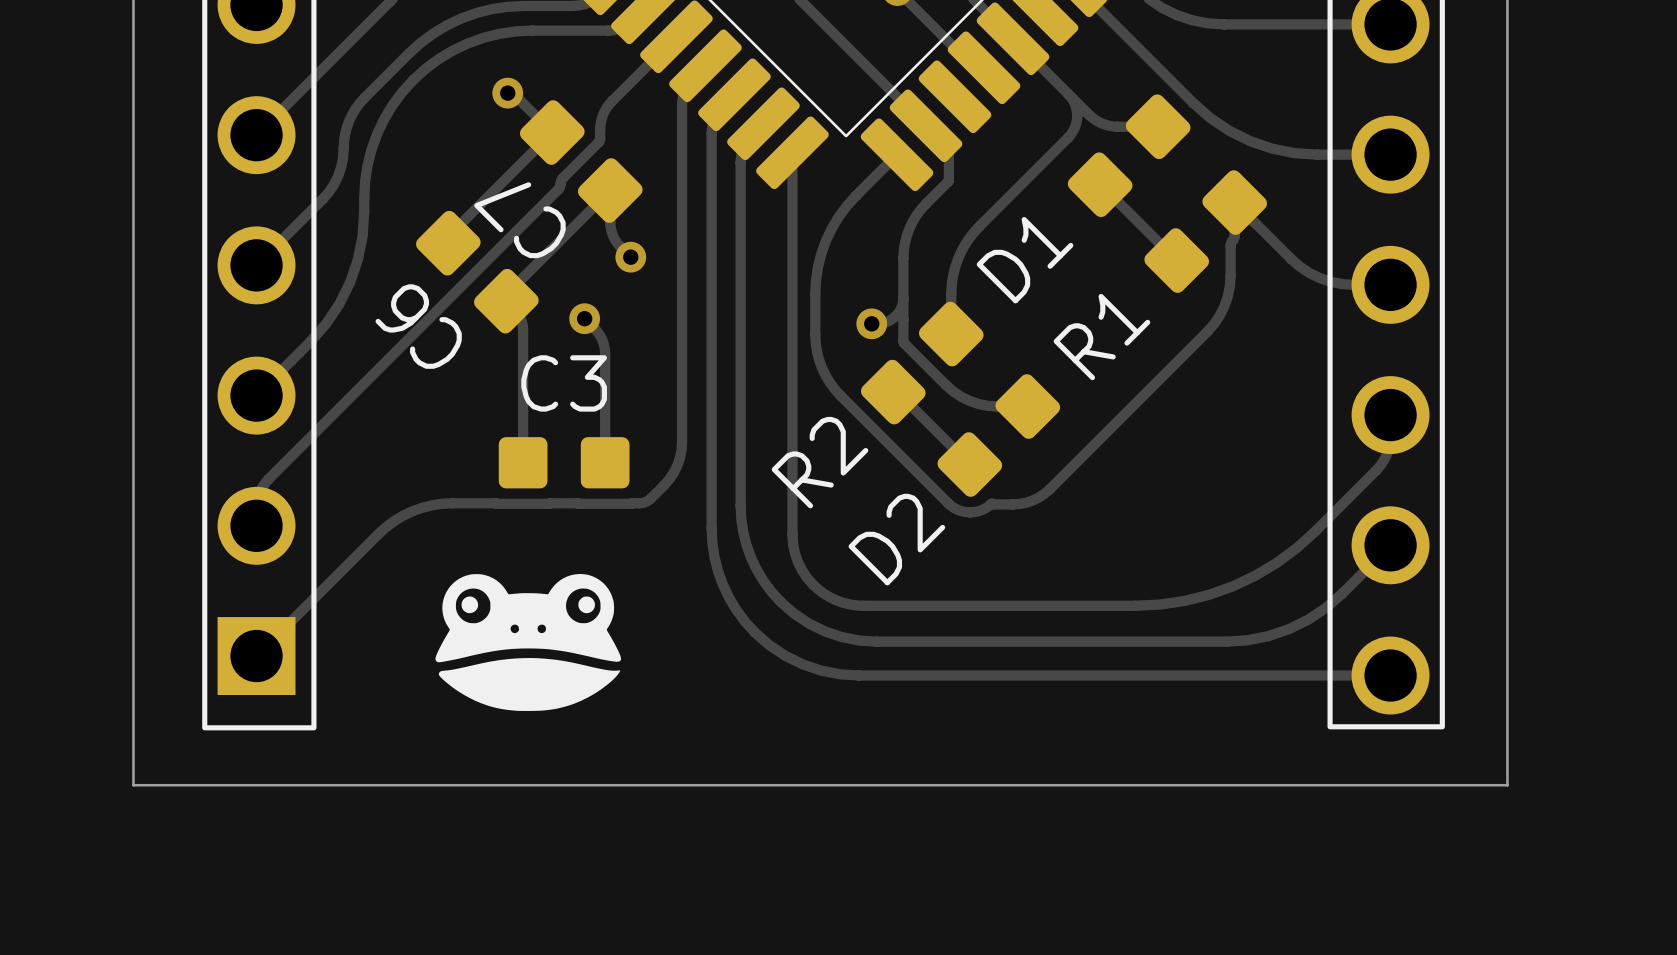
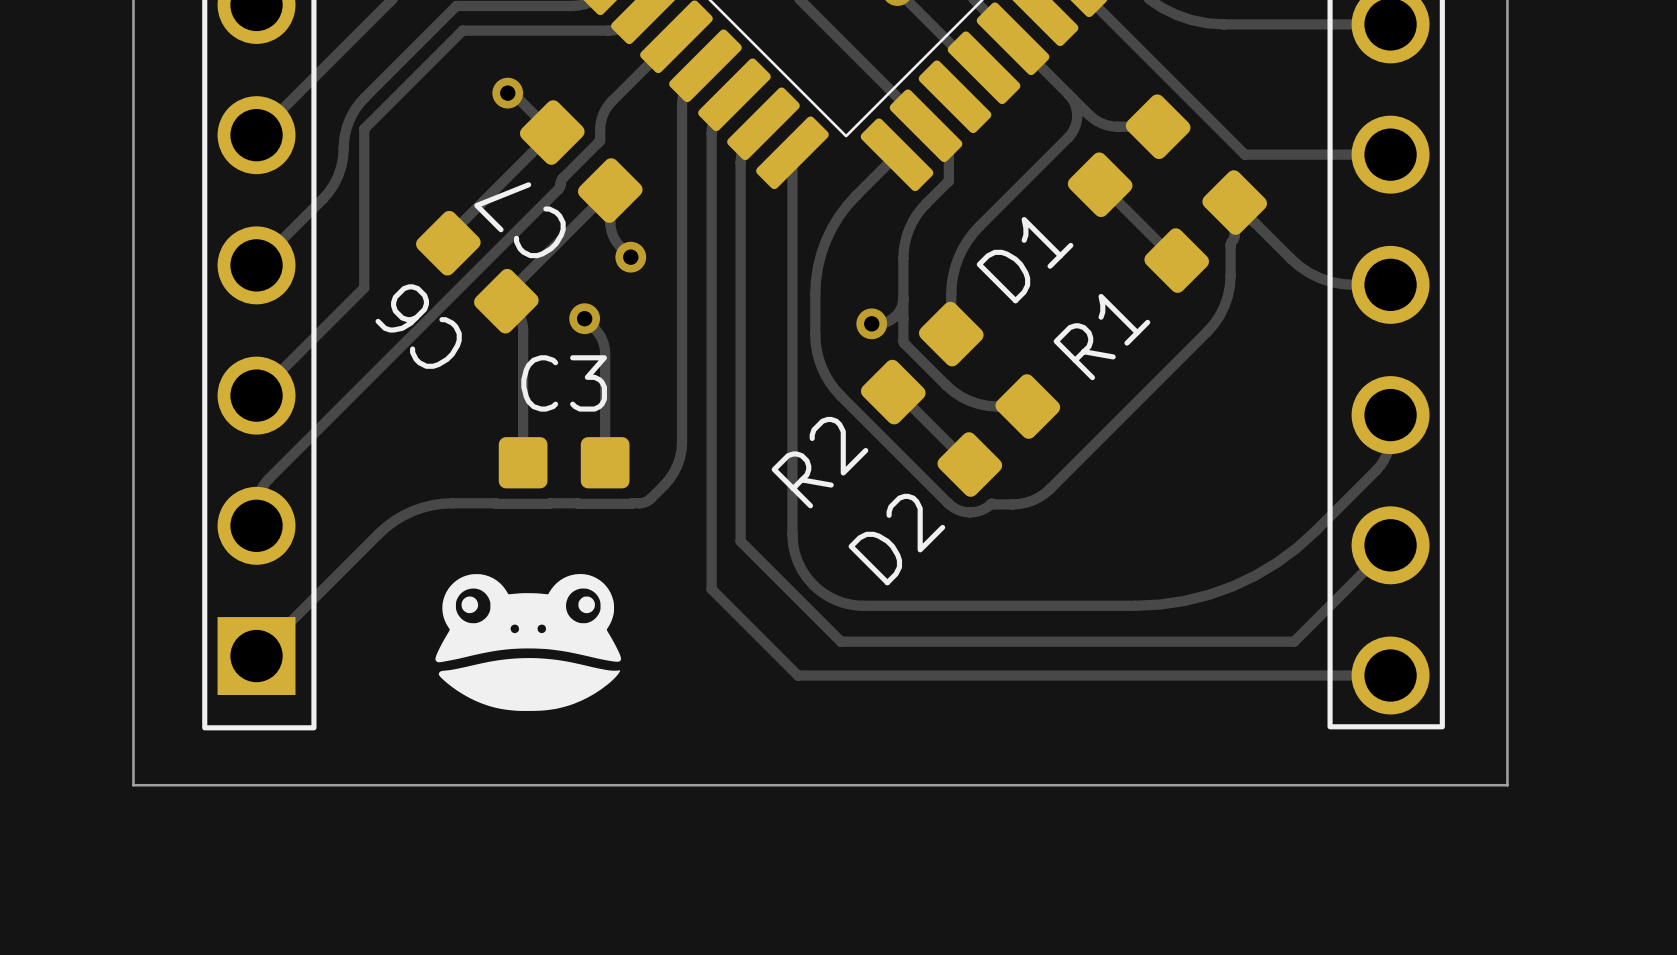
track: (523, 5) (492, 9) (461, 18) (433, 33) (408, 53) -> (523, 5) (456, 5) (408, 53)
track: (532, 30) (499, 33) (467, 43) (438, 58) (413, 79) (392, 105) (377, 134) (367, 165) (364, 198) -> (532, 30) (462, 30) (364, 129) (364, 198)
track: (1193, 103) (1210, 118) (1229, 131) (1250, 141) (1272, 148) (1294, 153) (1317, 154) -> (1193, 103) (1244, 154) (1317, 154)
track: (364, 211) (362, 235) (357, 259) (350, 282) (339, 303) (326, 323) (310, 341) -> (364, 211) (364, 287) (310, 341)
track: (740, 505) (743, 531) (751, 557) (763, 581) (780, 601) (793, 613) (824, 631) (841, 637) (876, 641) -> (740, 505) (740, 541) (840, 641) (876, 641)
track: (711, 528) (714, 556) (722, 584) (736, 610) (754, 632) (769, 645) (802, 664) (839, 674) (858, 675) -> (711, 528) (711, 589) (797, 675) (858, 675)
track: (1342, 593) (1326, 607) (1288, 629) (1268, 636) (1226, 641) -> (1342, 593) (1294, 641) (1226, 641)

